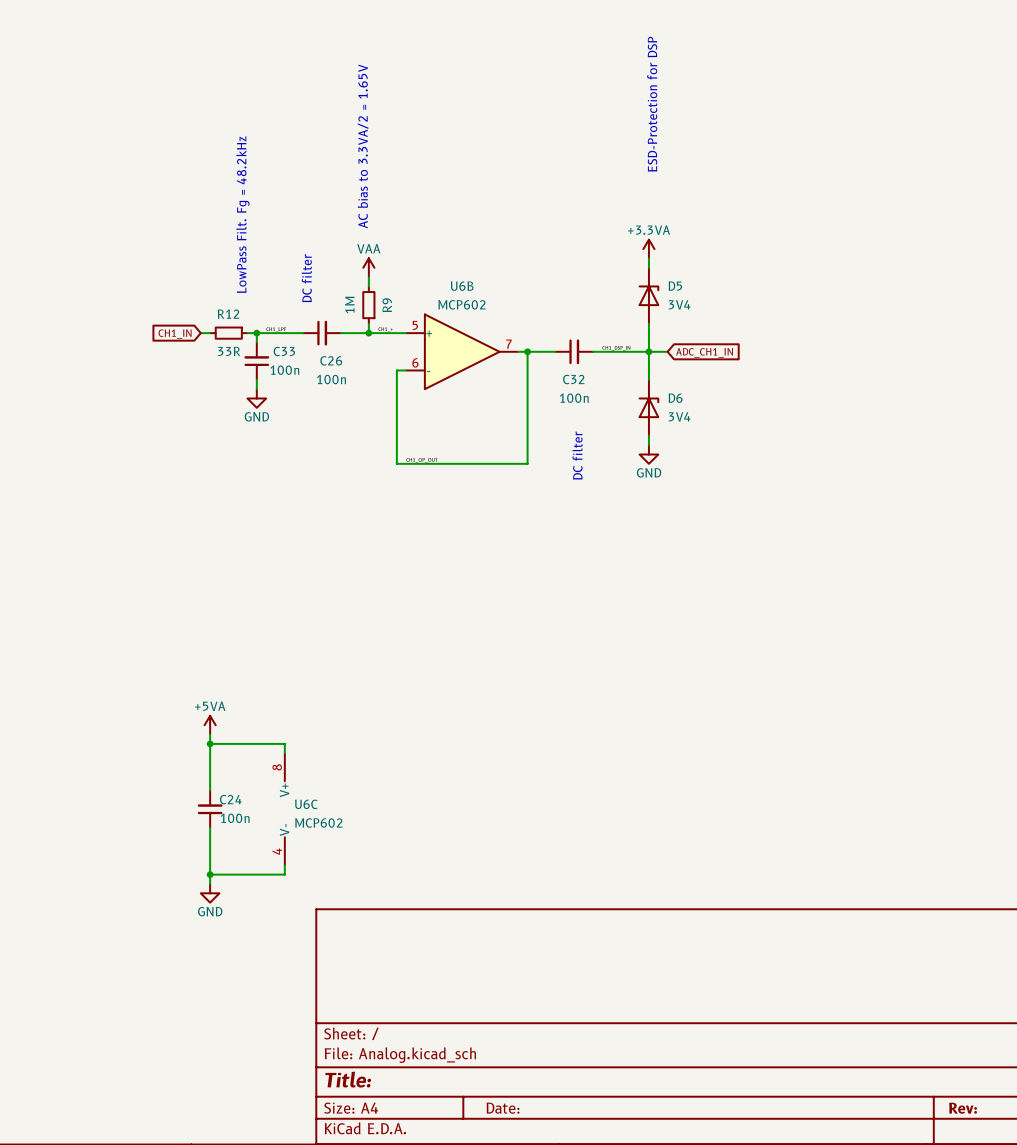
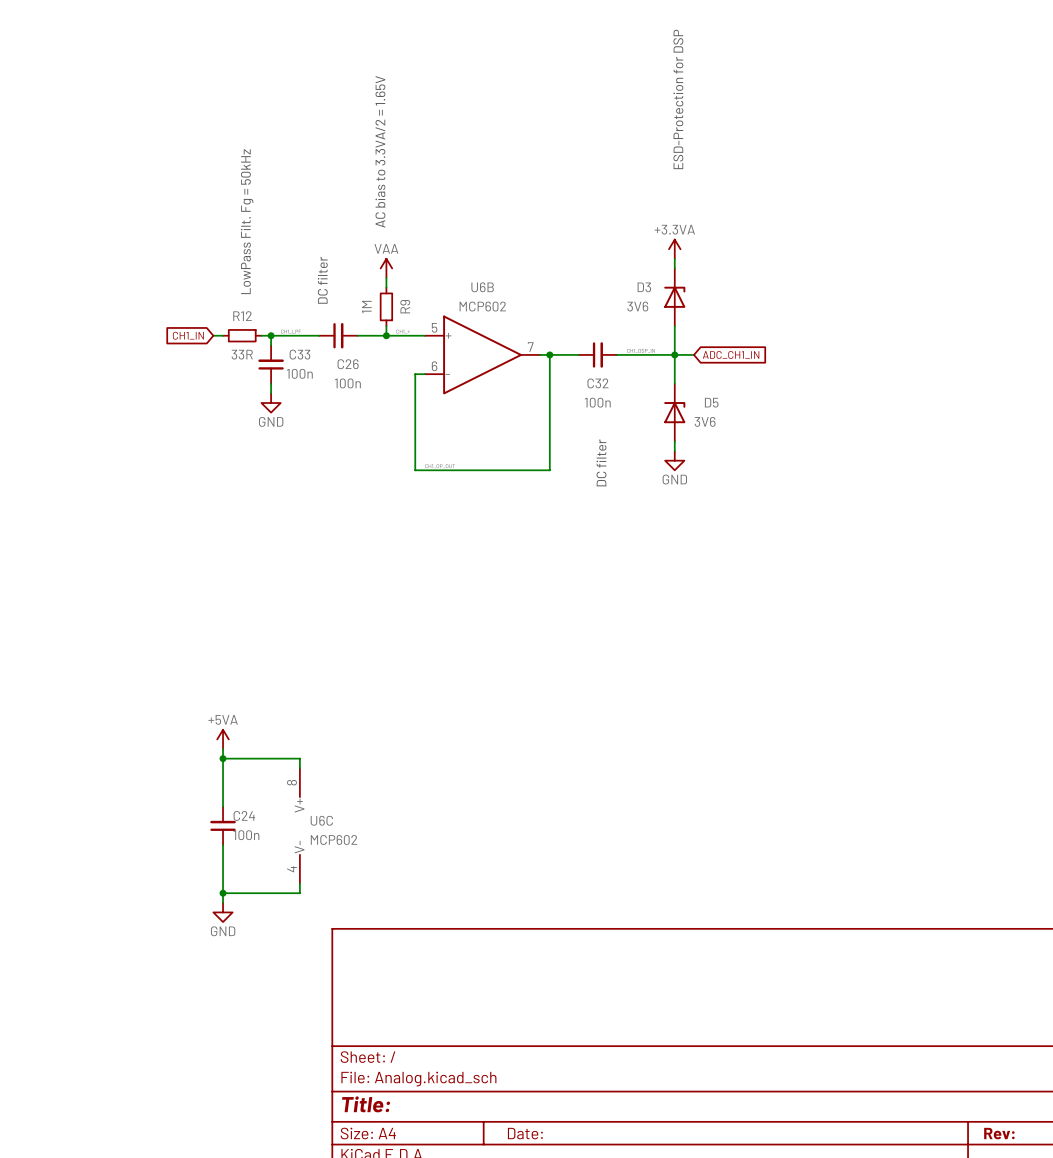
text: LowPass Filt. Fg = 48.2kHz (242, 214) -> LowPass Filt. Fg = 50kHz (247, 221)
D5 name: D5 (675, 286) -> D3 (644, 287)
D5 value: 3V4 (679, 304) -> 3V6 (637, 306)
D6 name: D6 (675, 398) -> D5 (711, 402)
D6 value: 3V4 (679, 416) -> 3V6 (705, 421)

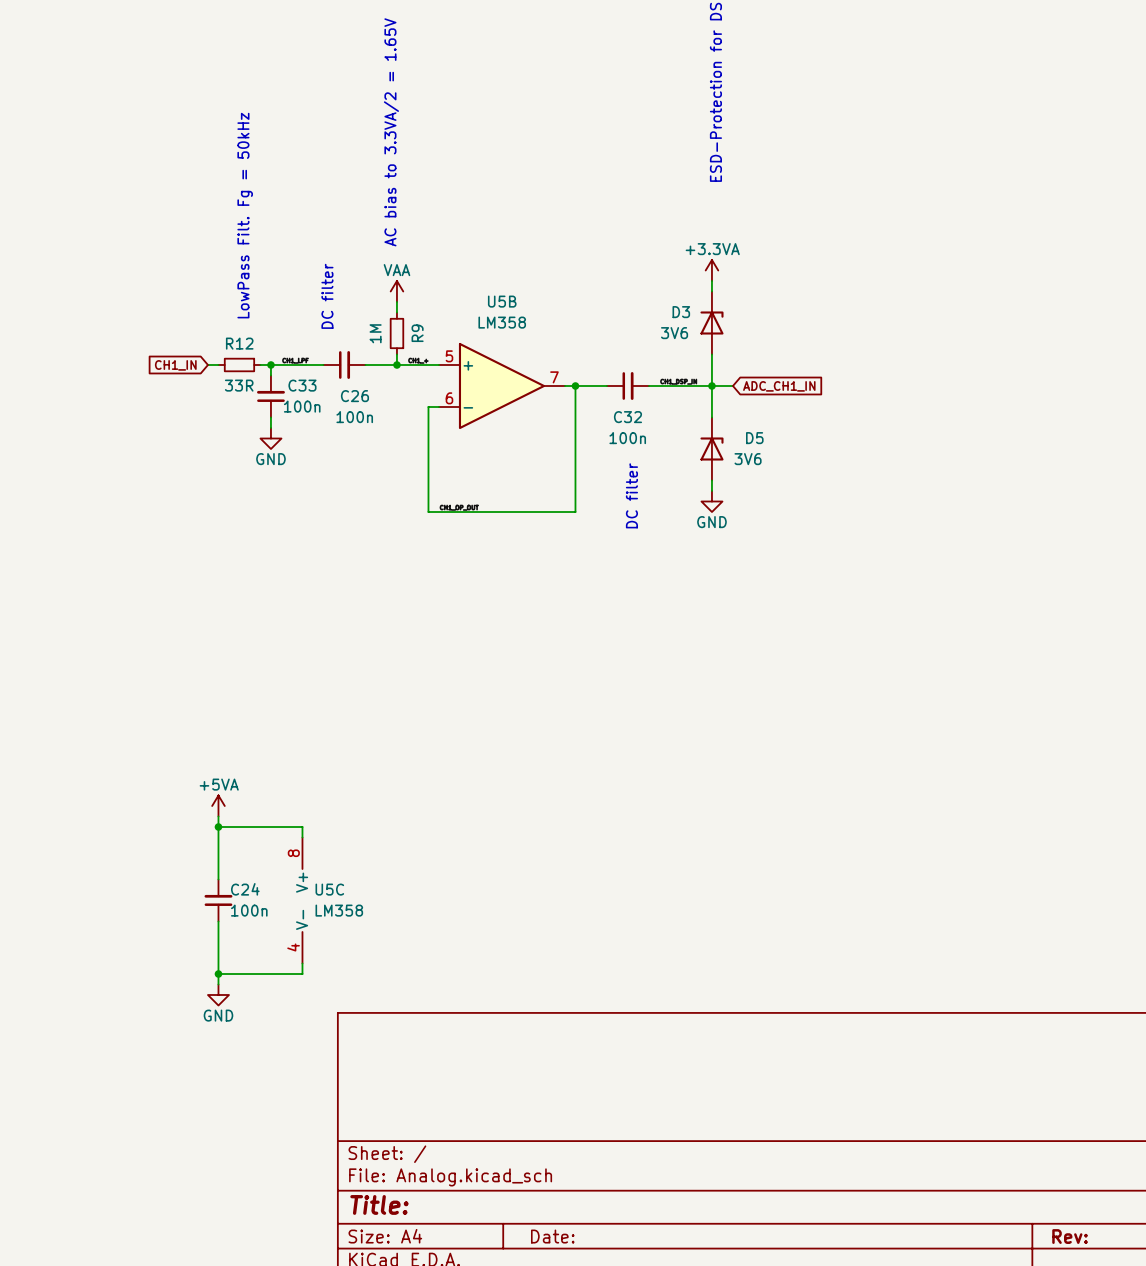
U6B name: U6B (482, 287) -> U5B (502, 301)
U6B value: MCP602 (482, 306) -> LM358 (502, 322)
U6C name: U6C (321, 820) -> U5C (329, 889)
U6C value: MCP602 (334, 839) -> LM358 (339, 910)

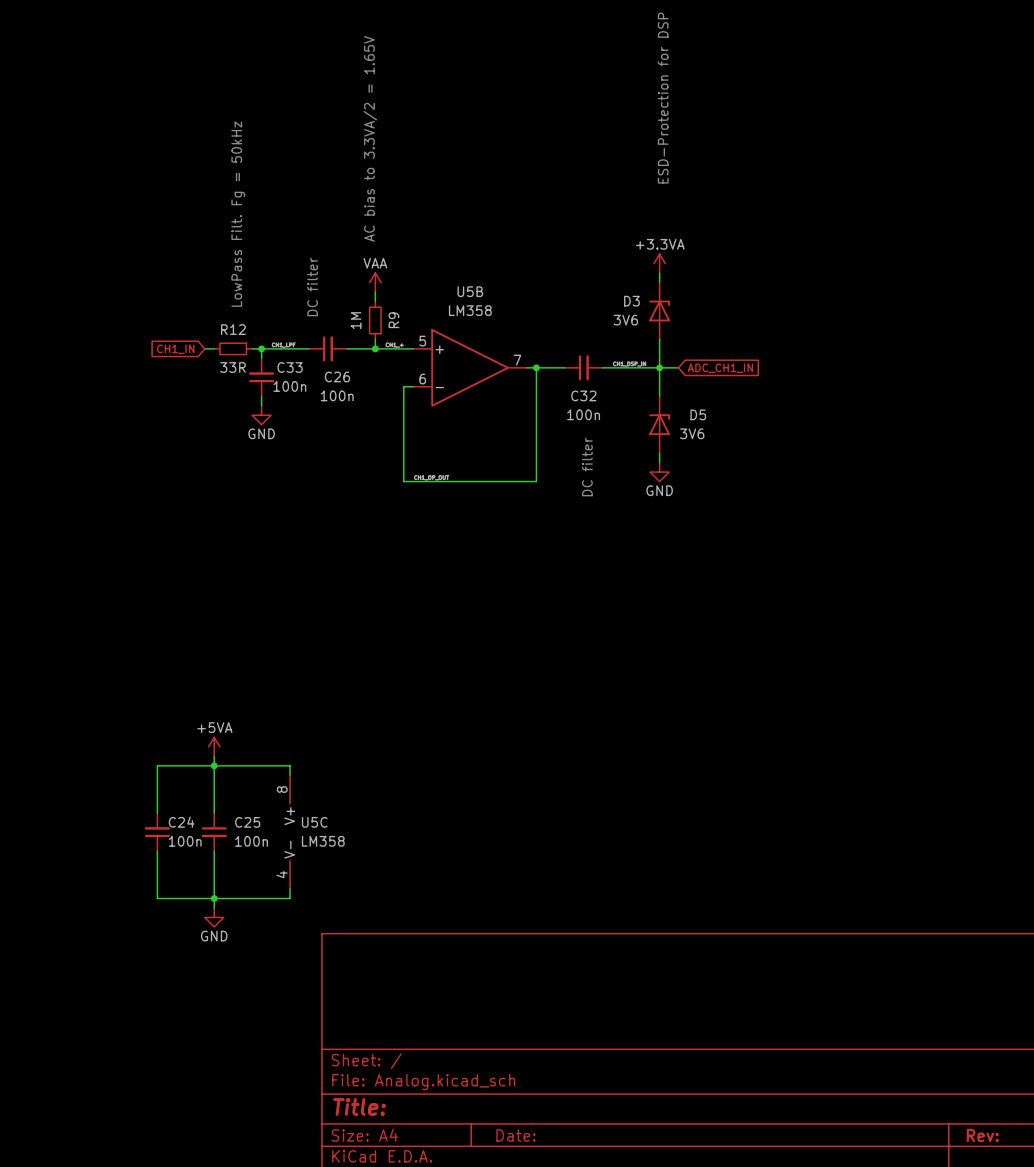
wire: none -> (214, 765) (157, 765) (157, 813)
C24 position: (218, 900) -> (157, 832)
C25: none -> 100n (214, 832)
wire: none -> (157, 851) (157, 898) (214, 898)

